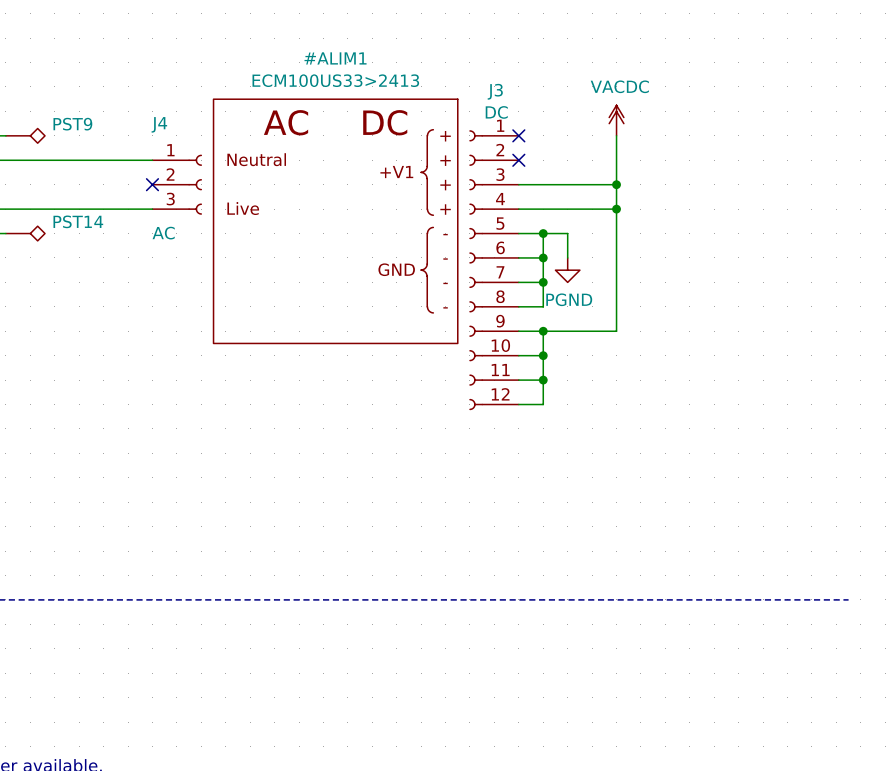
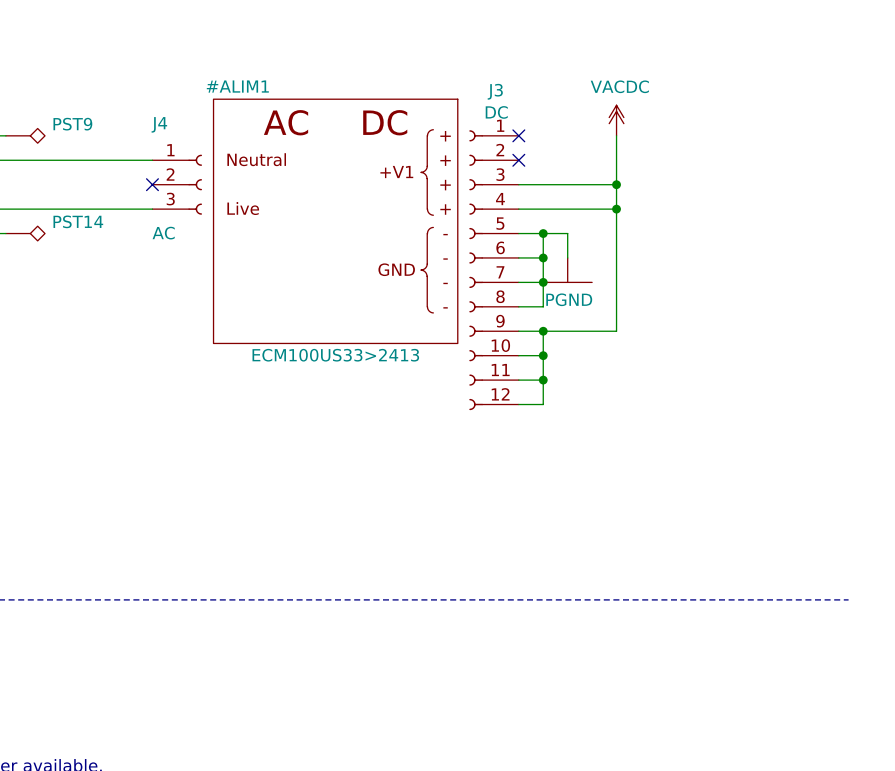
#ALIM1 name position: #ALIM1 (335, 58) -> #ALIM1 (237, 86)
#ALIM1 text position: ECM100US33>2413 (335, 80) -> ECM100US33>2413 (335, 355)
power symbol shape: [555, 257, 580, 283] -> [543, 257, 593, 283]

